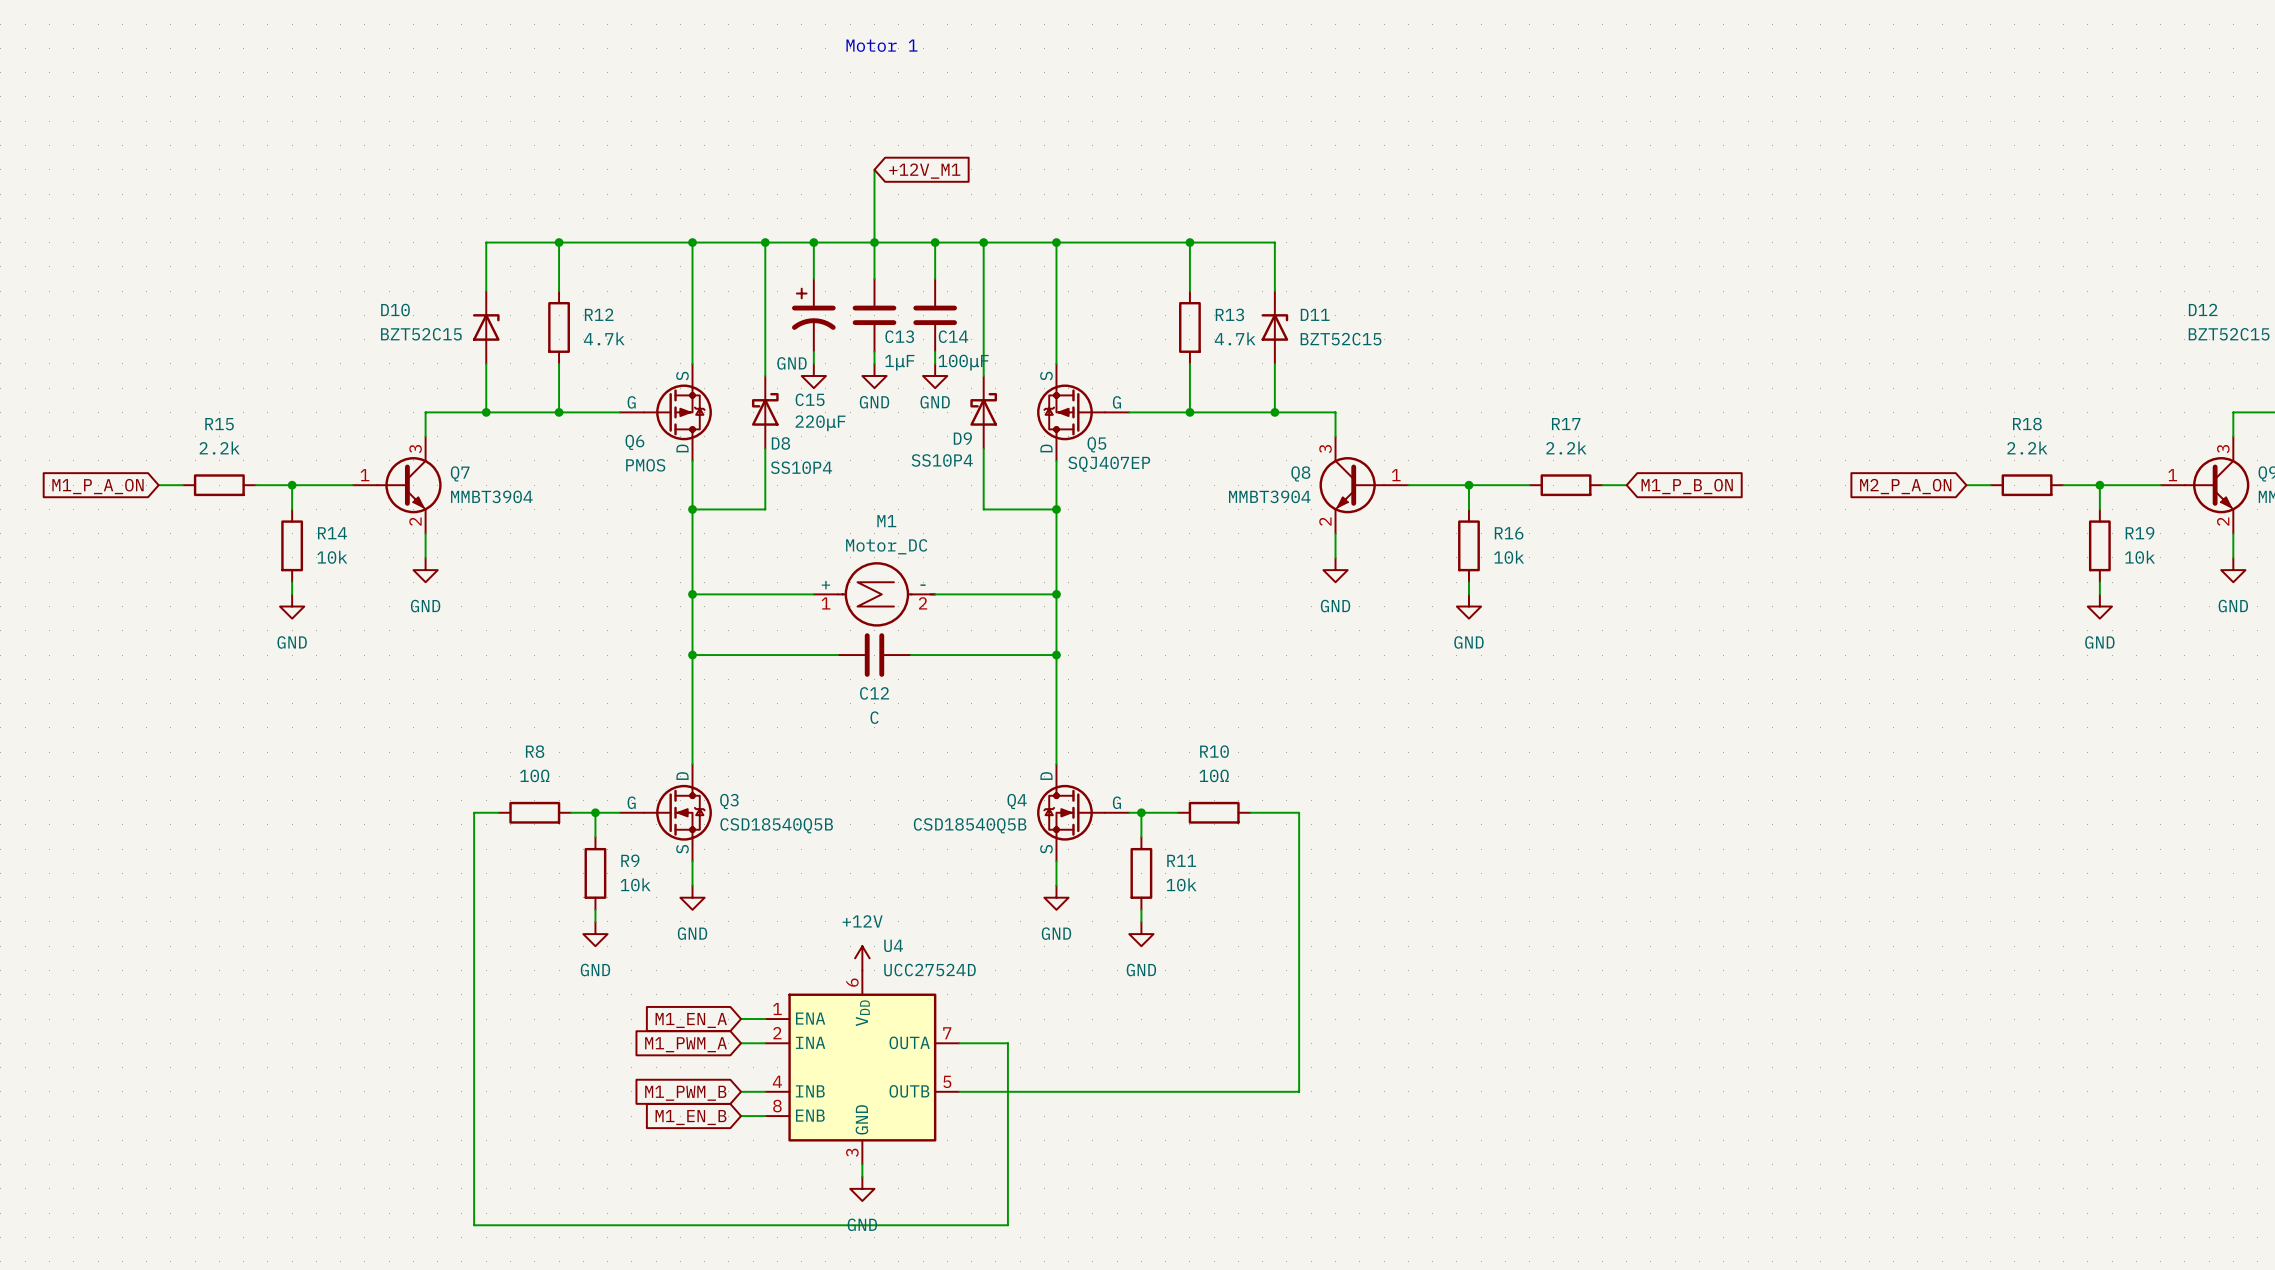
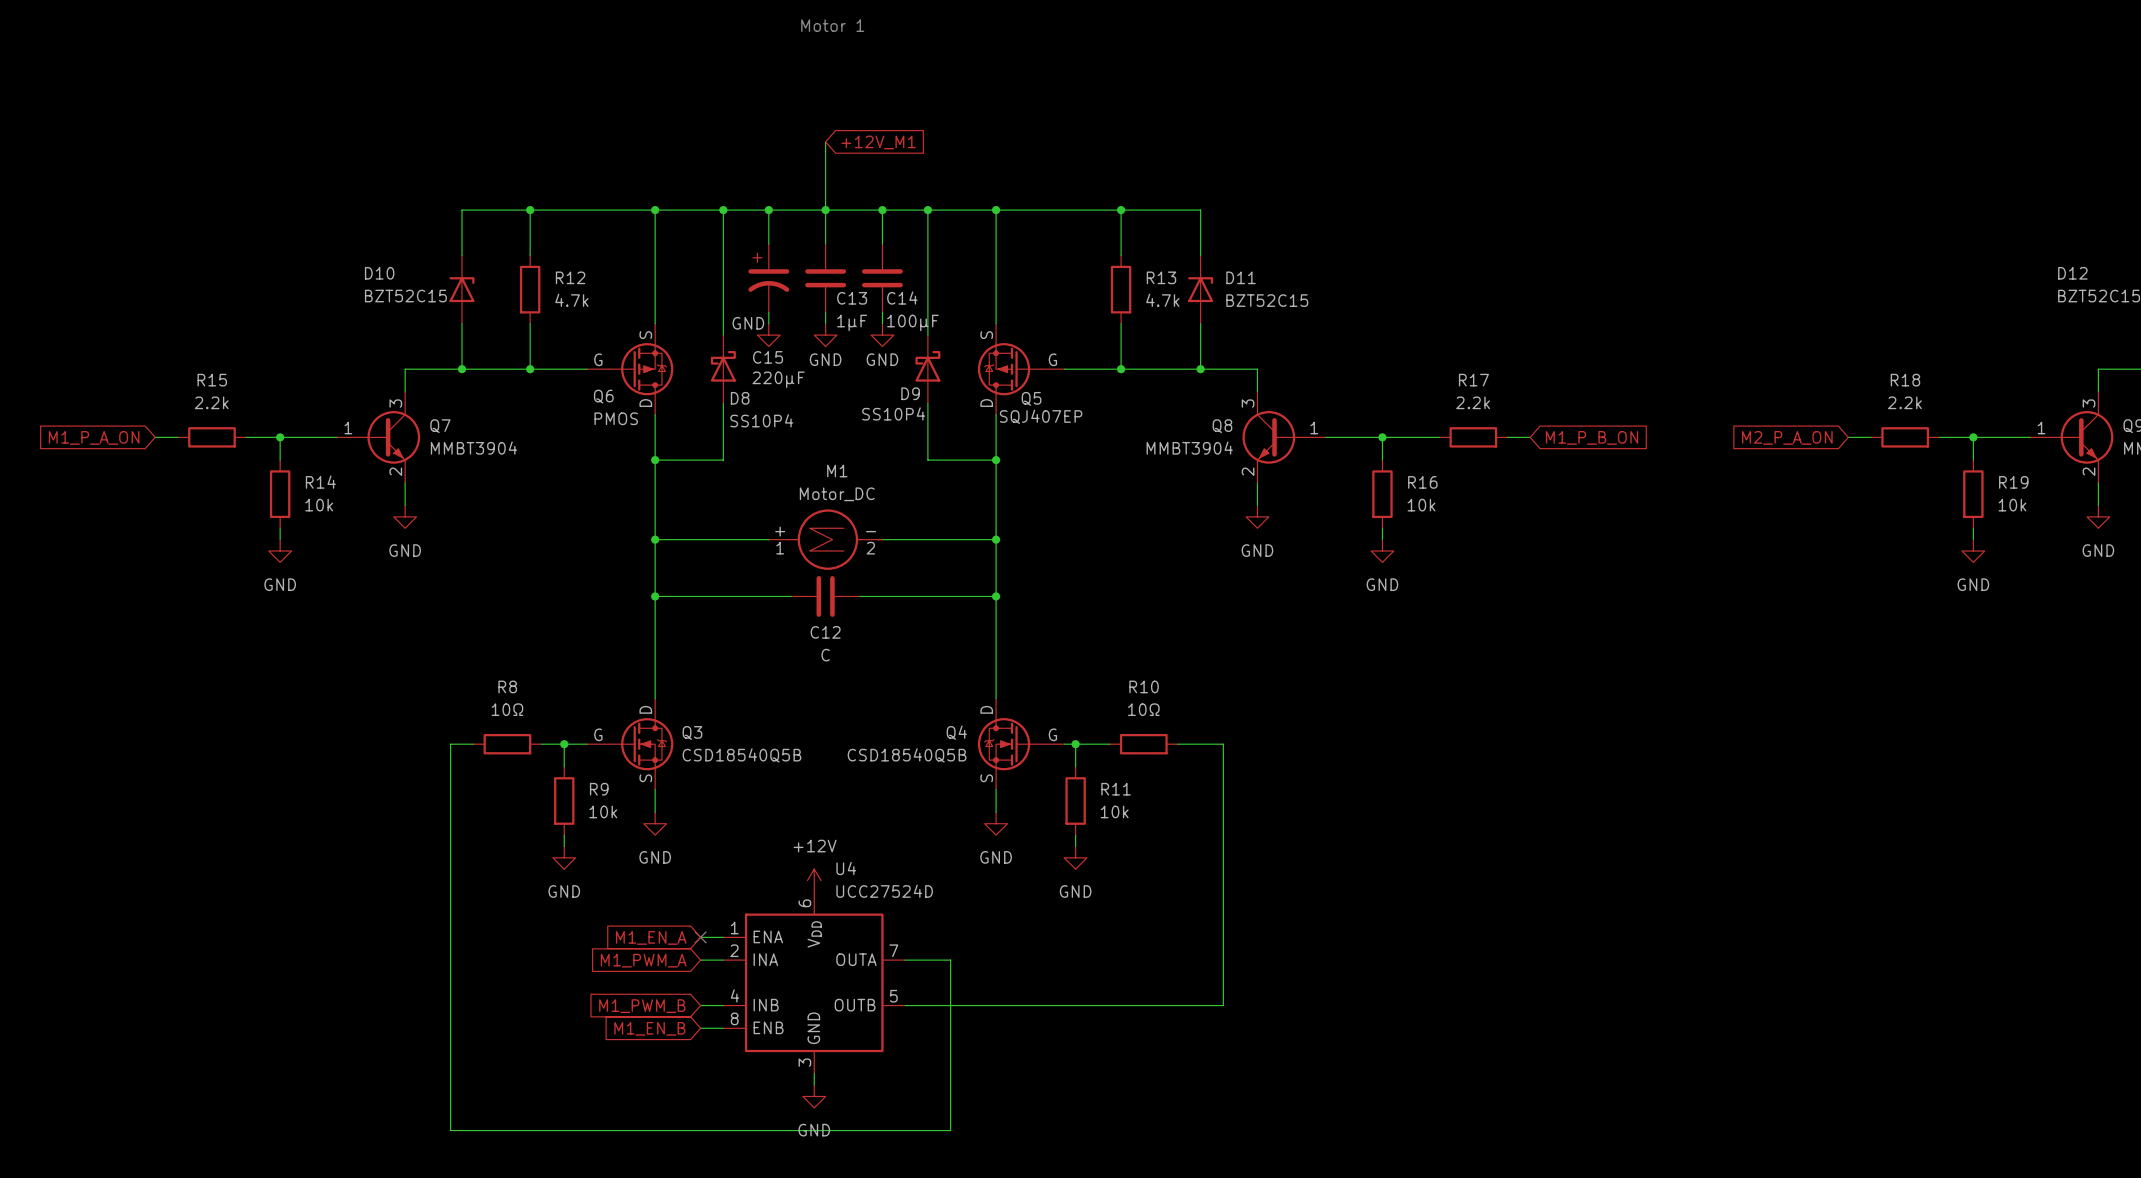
no-connect mark: none -> (700, 937)

